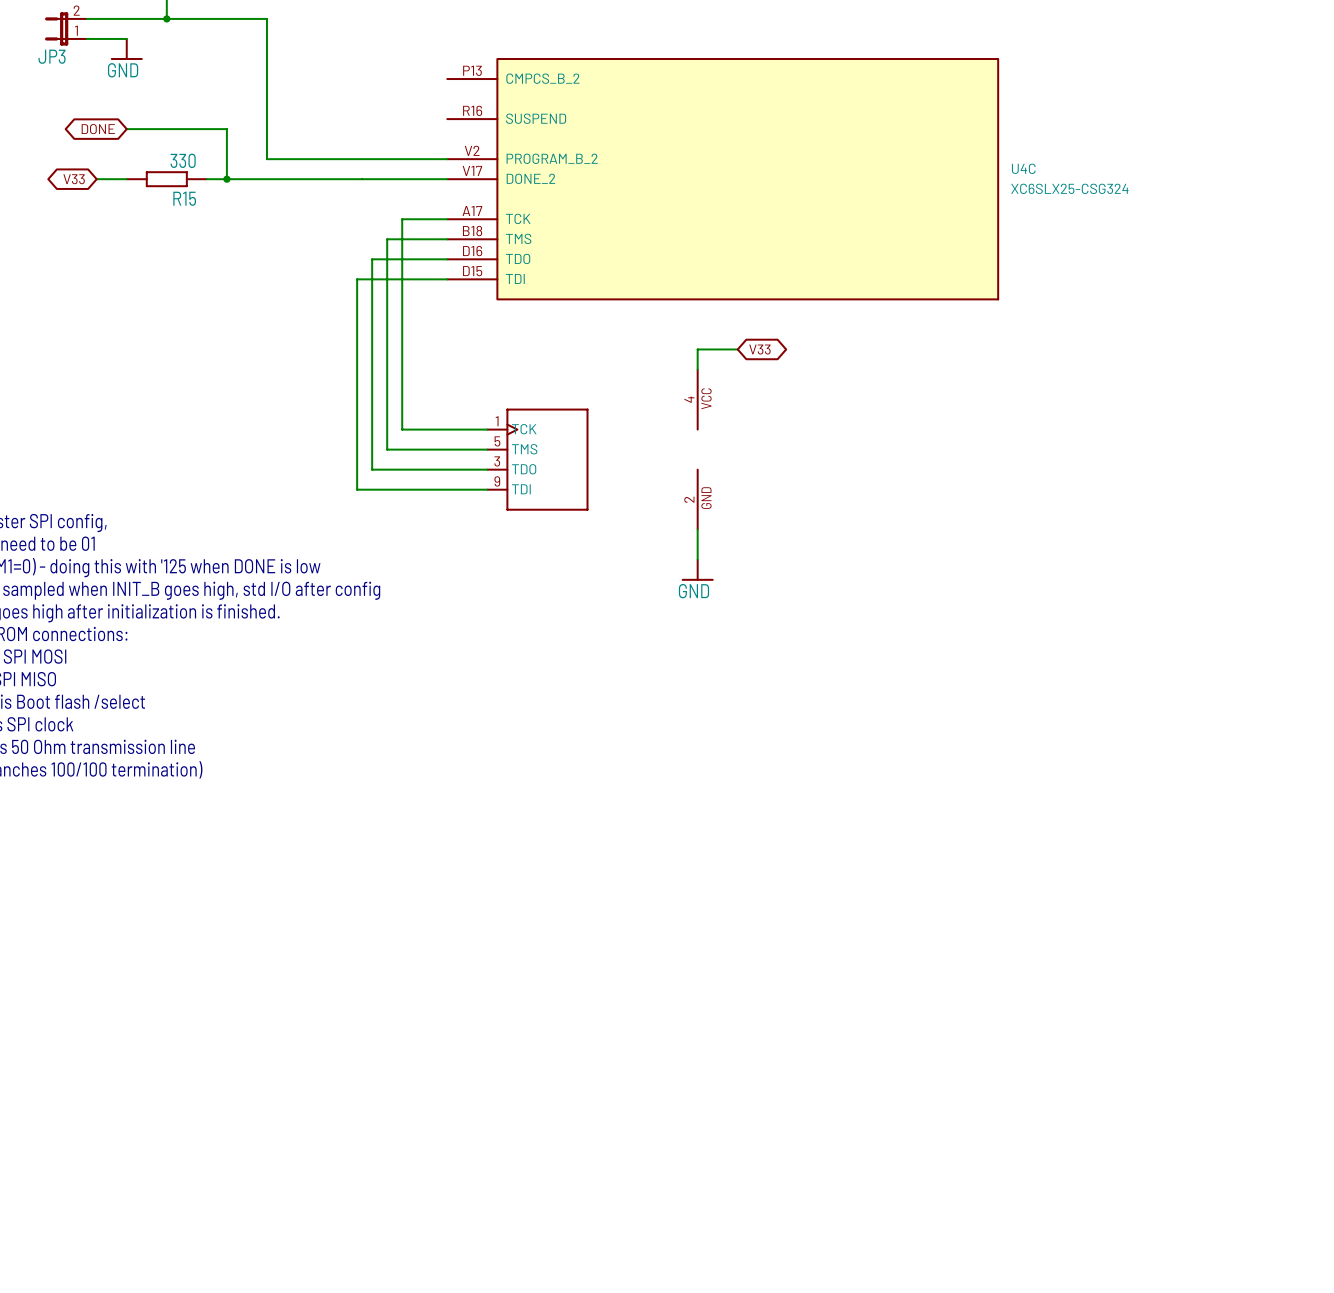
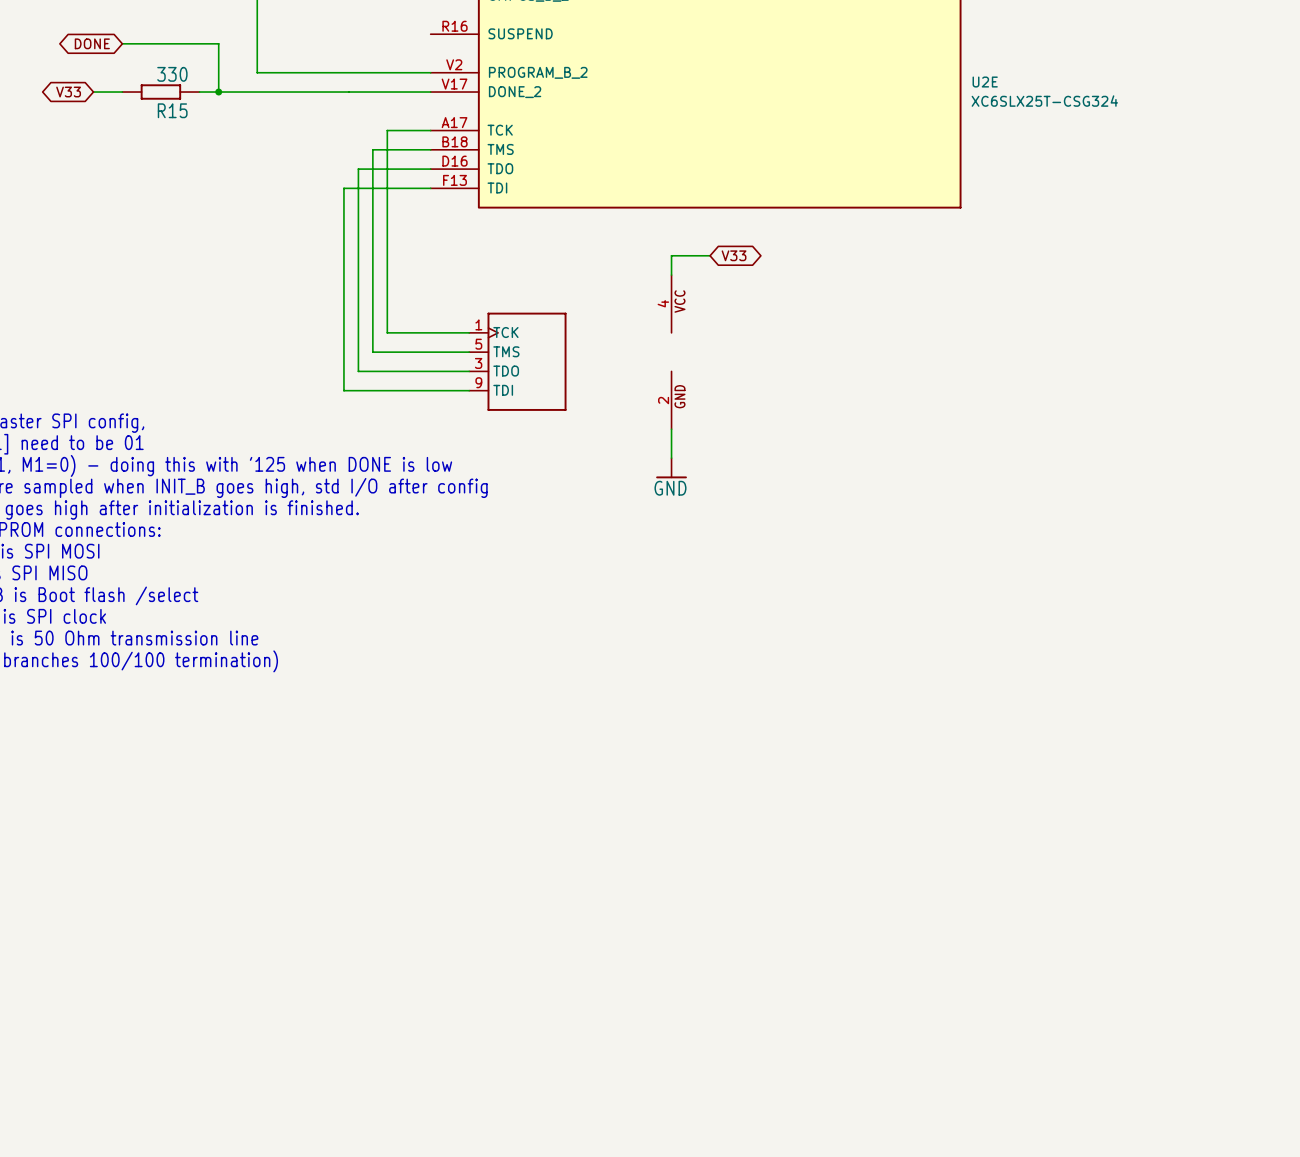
U4C name: U4C (1023, 168) -> U2E (985, 82)
U4C value: XC6SLX25-CSG324 (1069, 188) -> XC6SLX25T-CSG324 (1044, 101)
U4C pin number: D15 (472, 271) -> F13 (454, 180)

